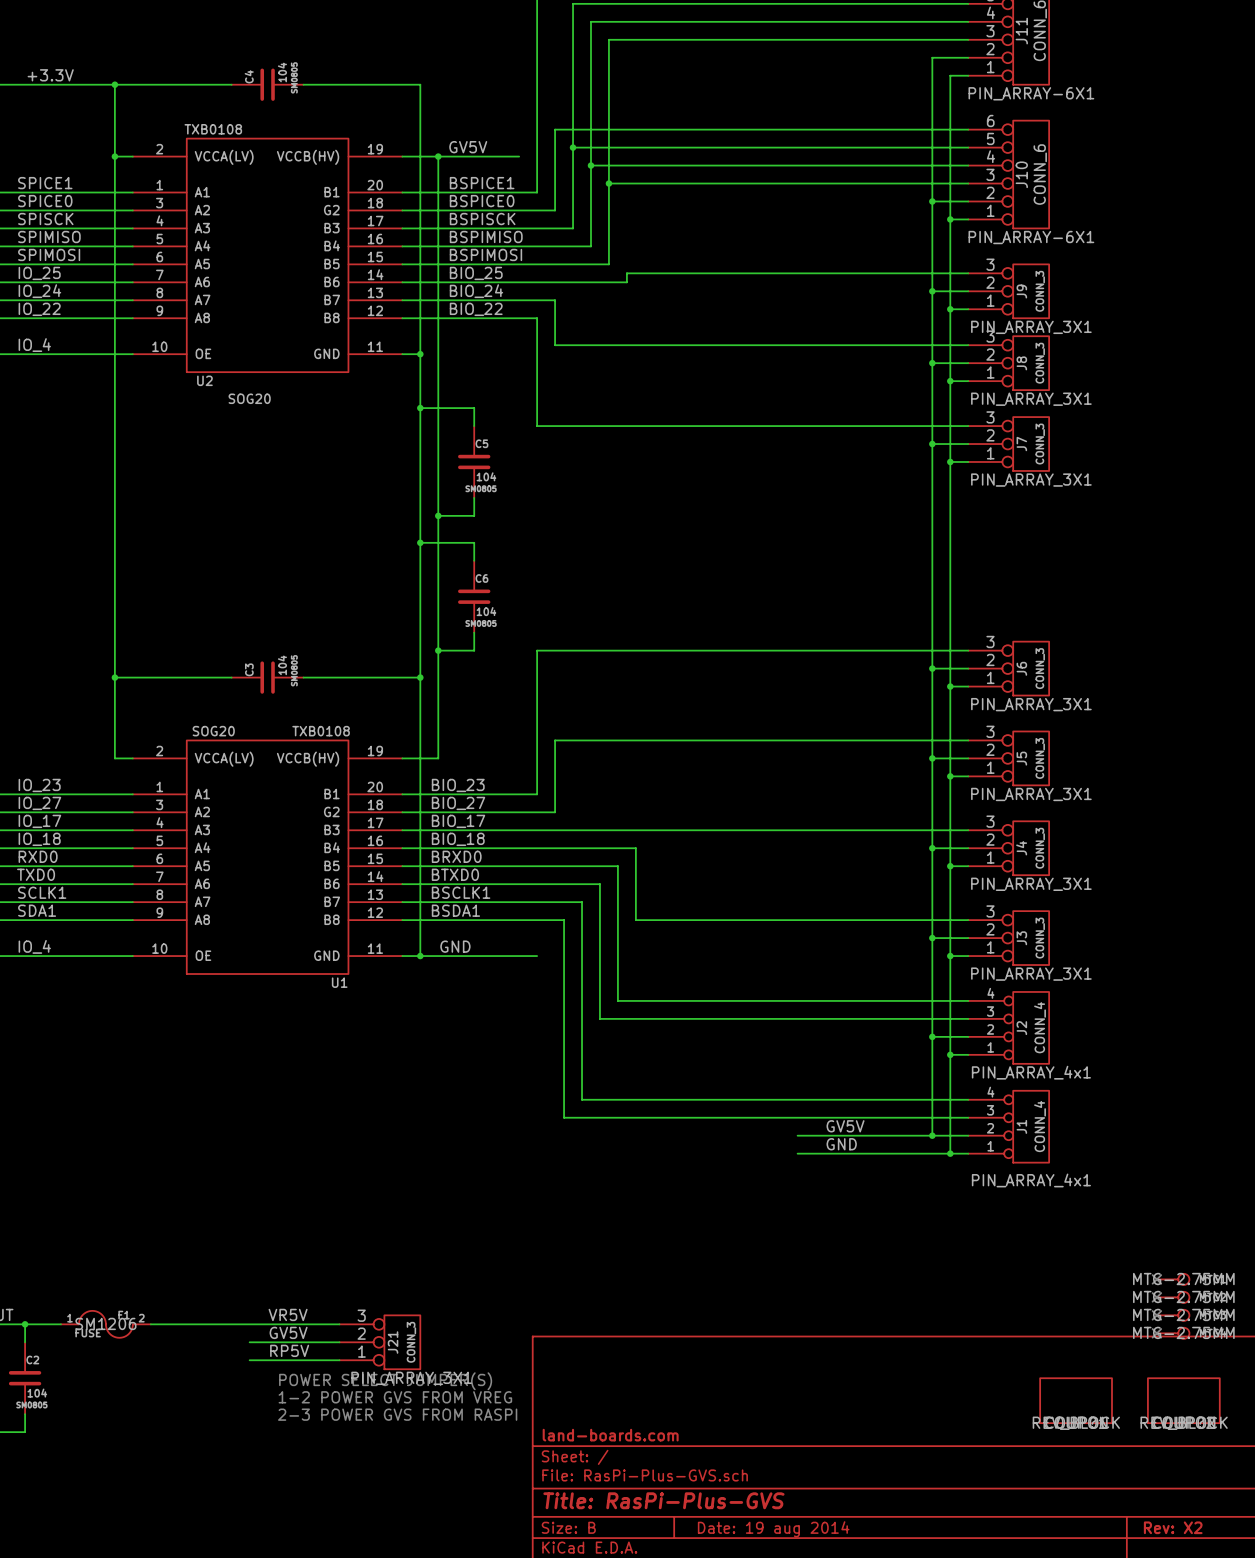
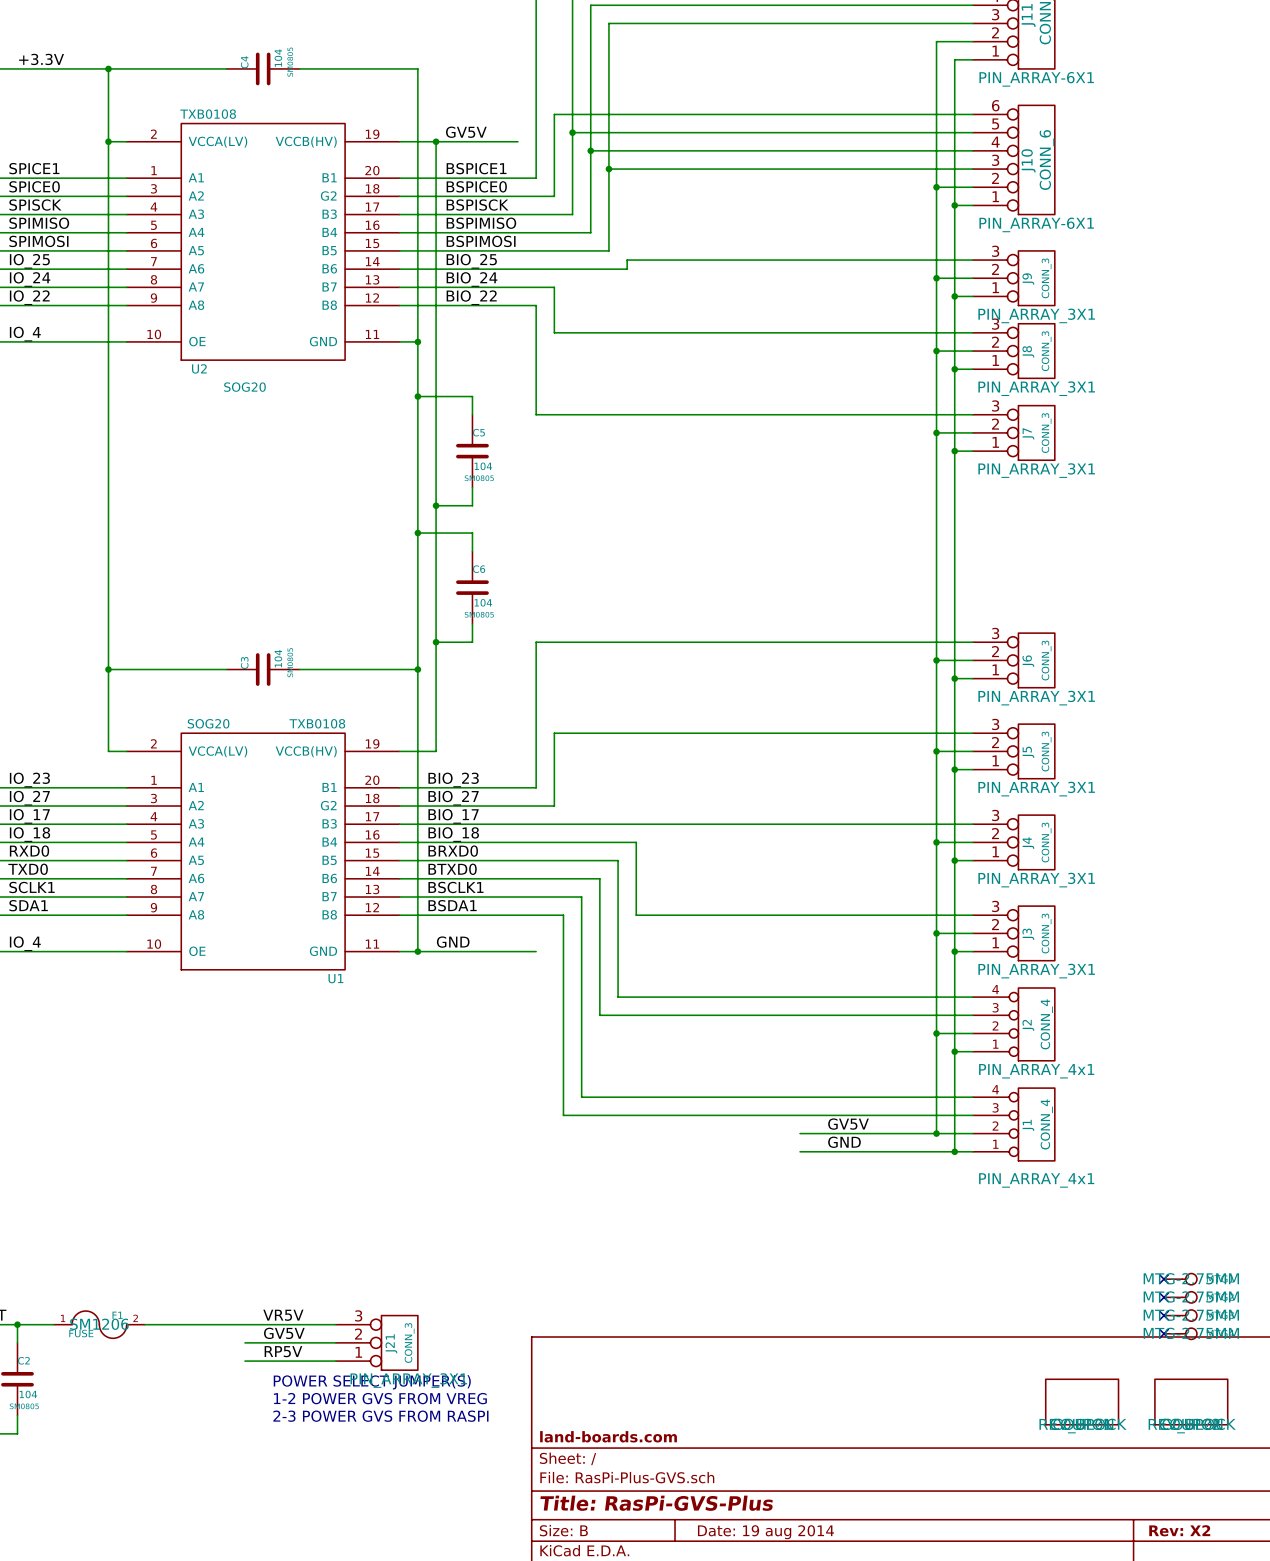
title block: Title: RasPi-Plus-GVS (663, 1500) -> Title: RasPi-GVS-Plus (656, 1503)

